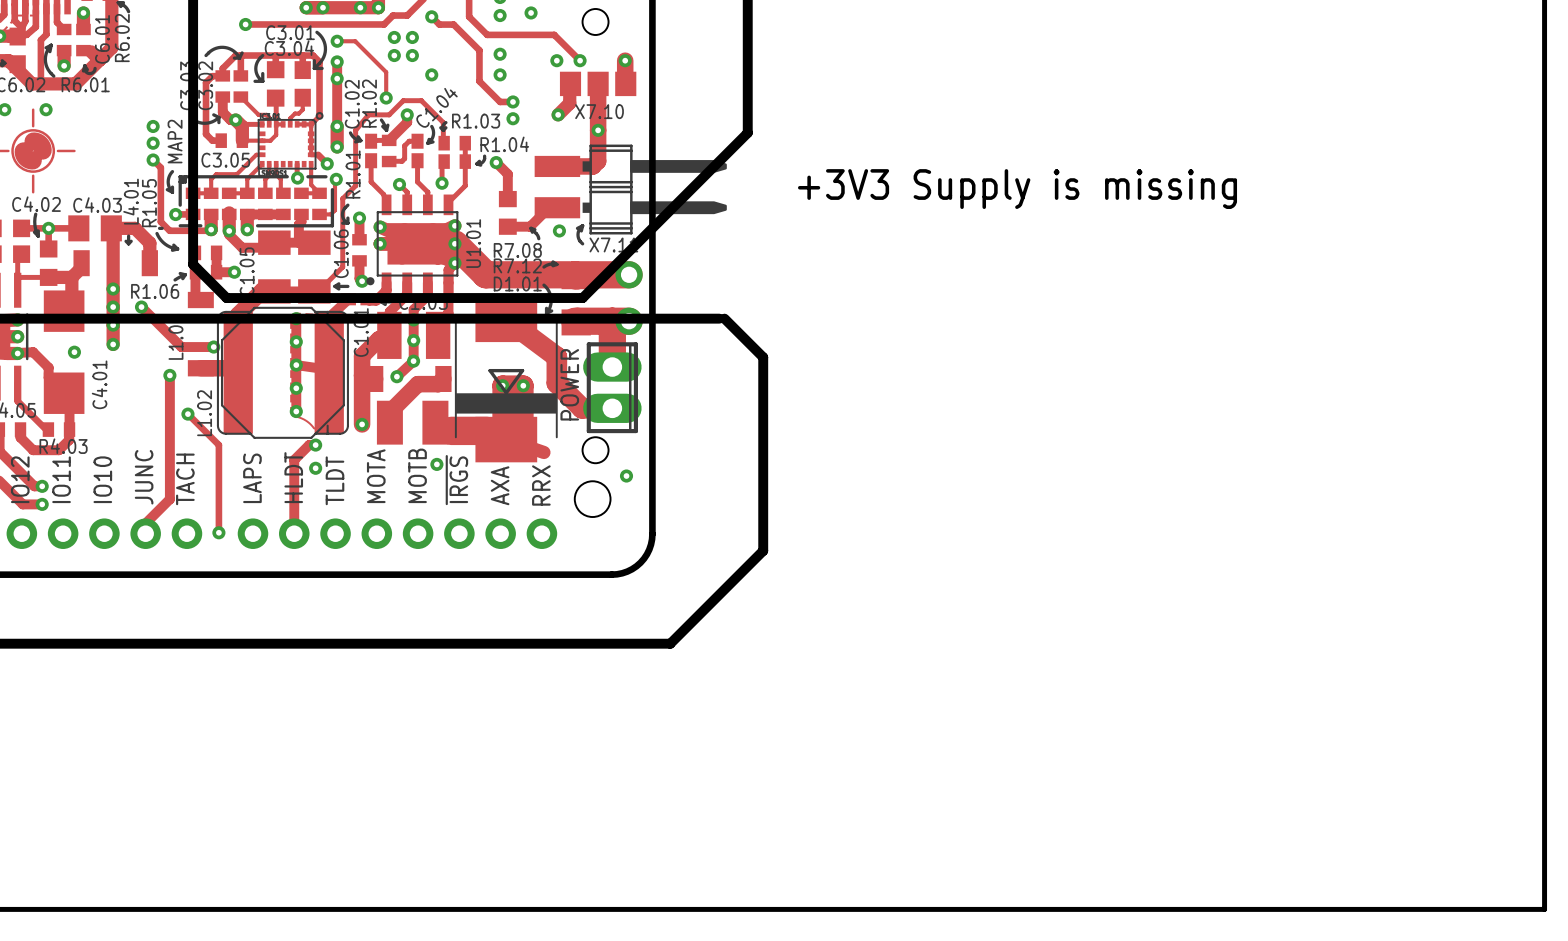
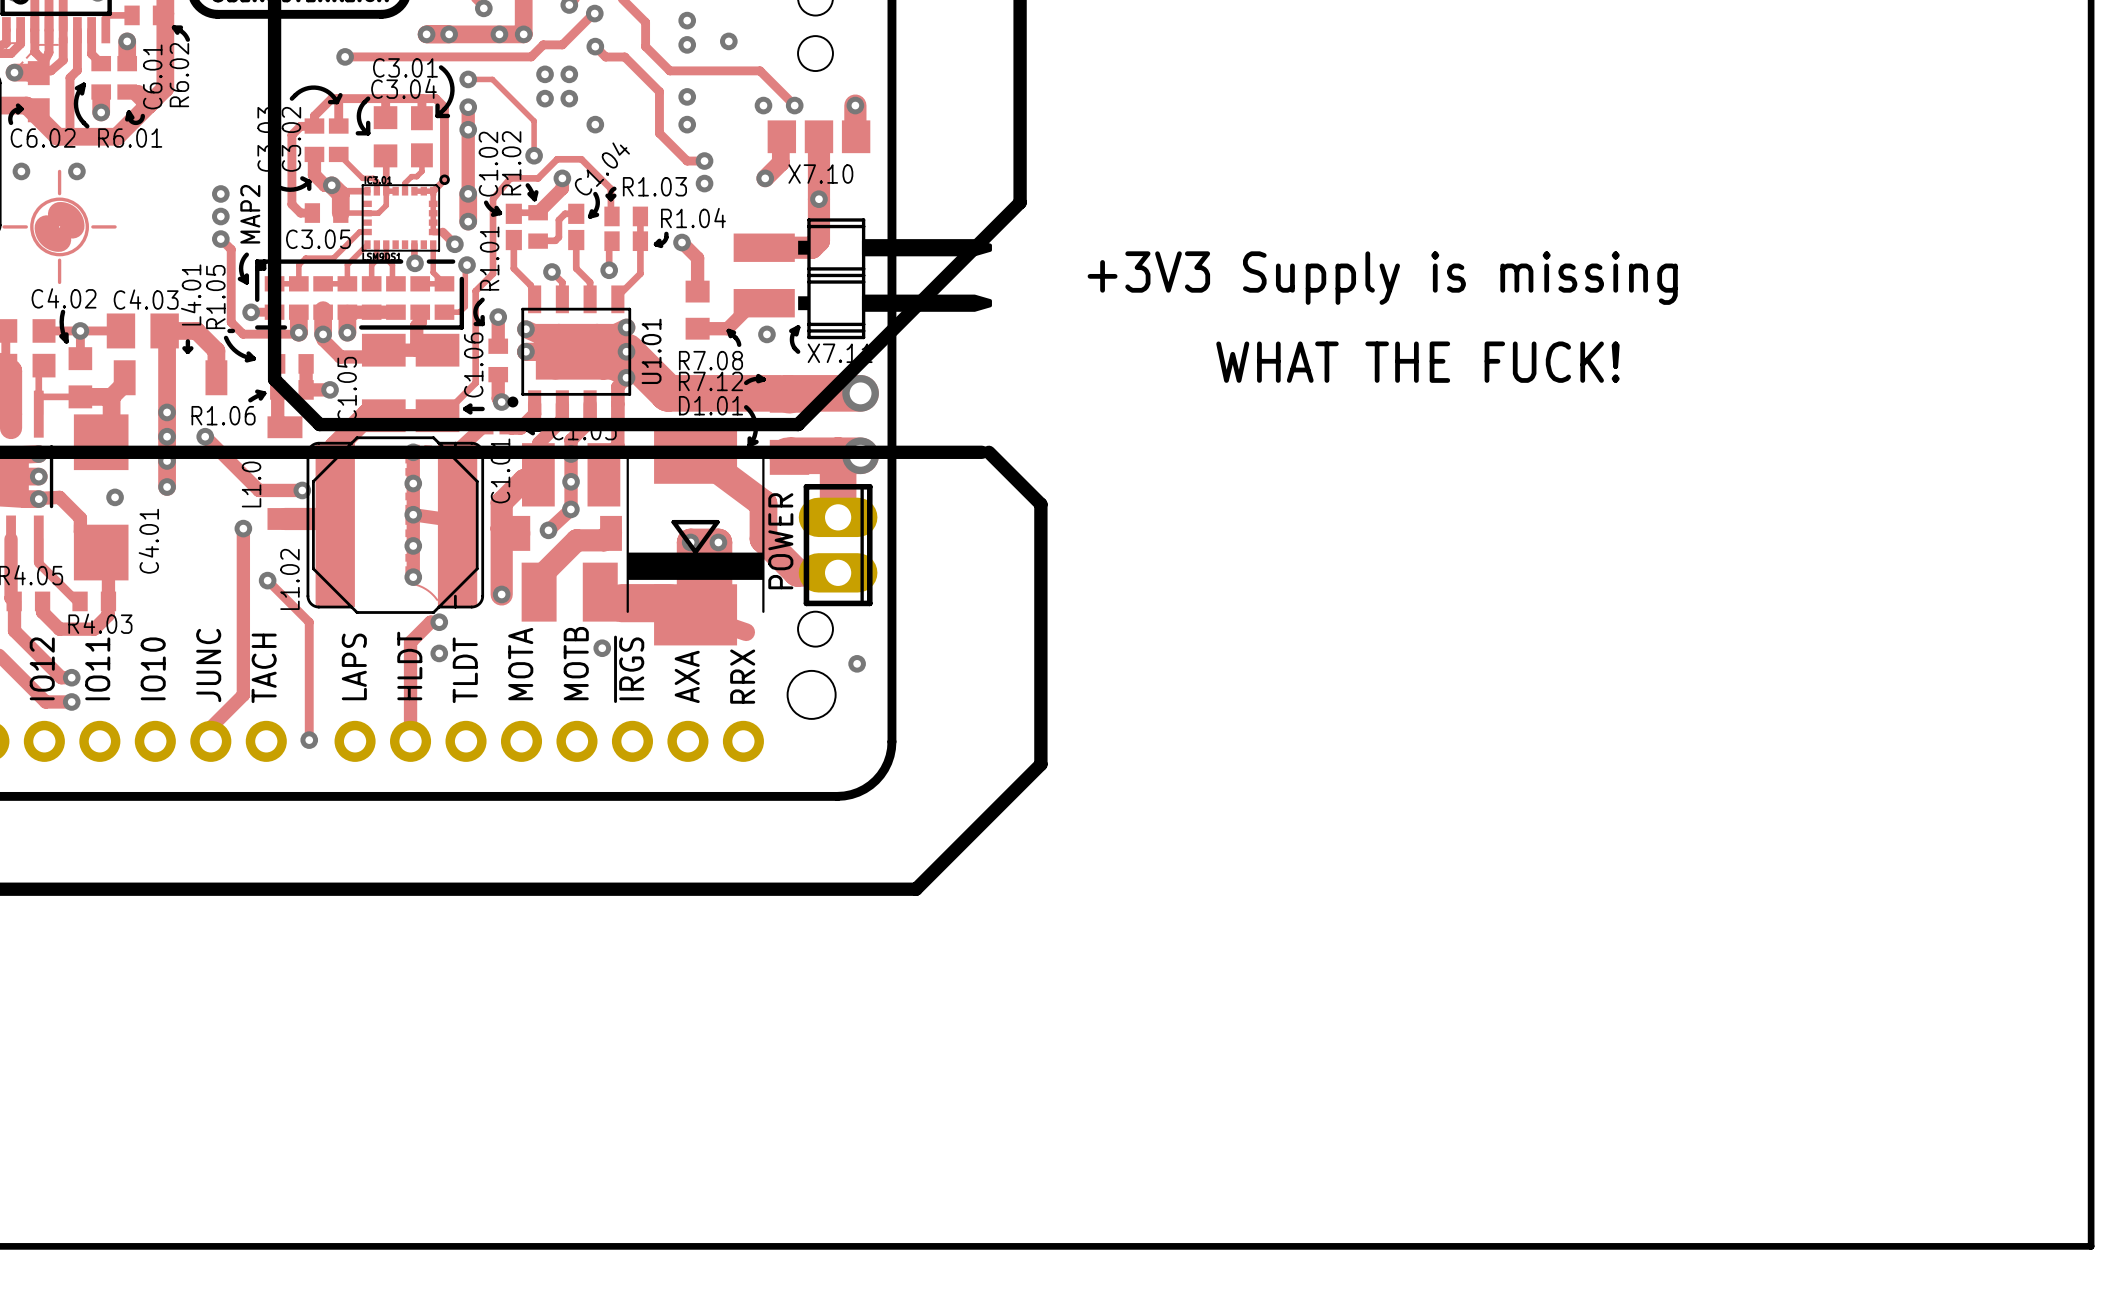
text: none -> WHAT THE FUCK! (1417, 362)

